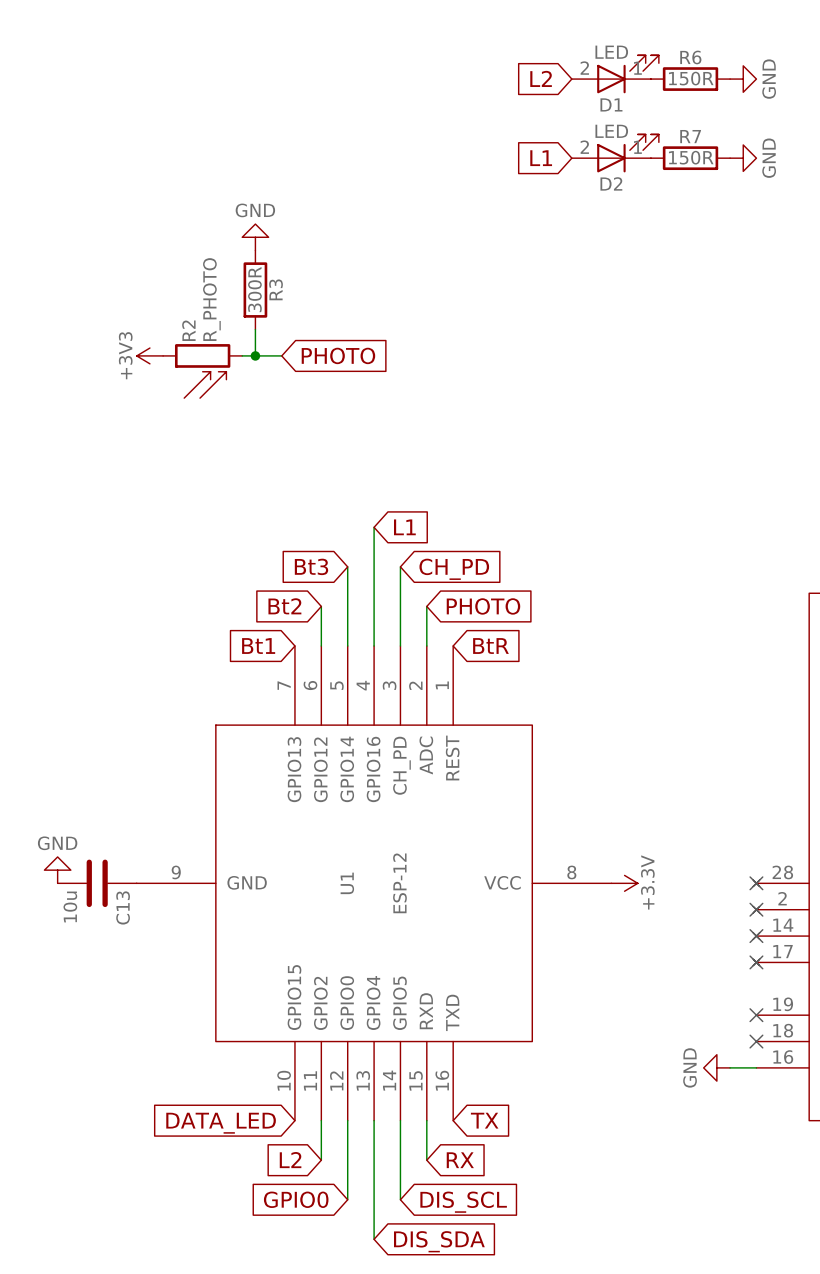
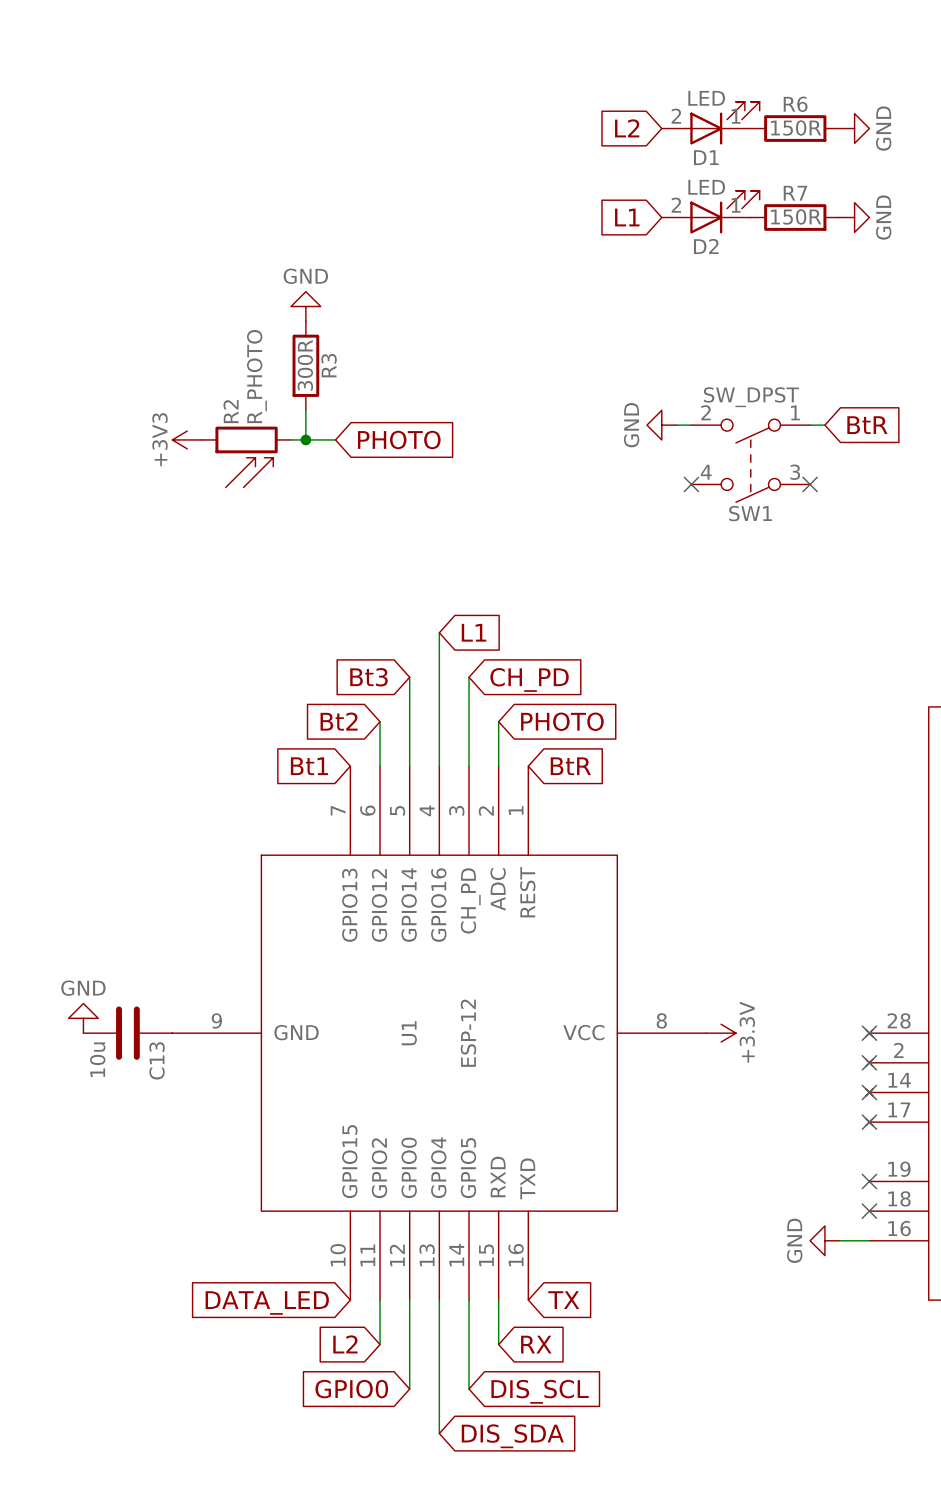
power symbol: none -> GND (661, 425)
wire: none -> (676, 425) (691, 425)
wire: none -> (810, 425) (824, 425)
global label: none -> BtR (867, 425)
SW1: none -> SW_DPST (750, 460)
no-connect mark: none -> (691, 484)
no-connect mark: none -> (810, 484)

